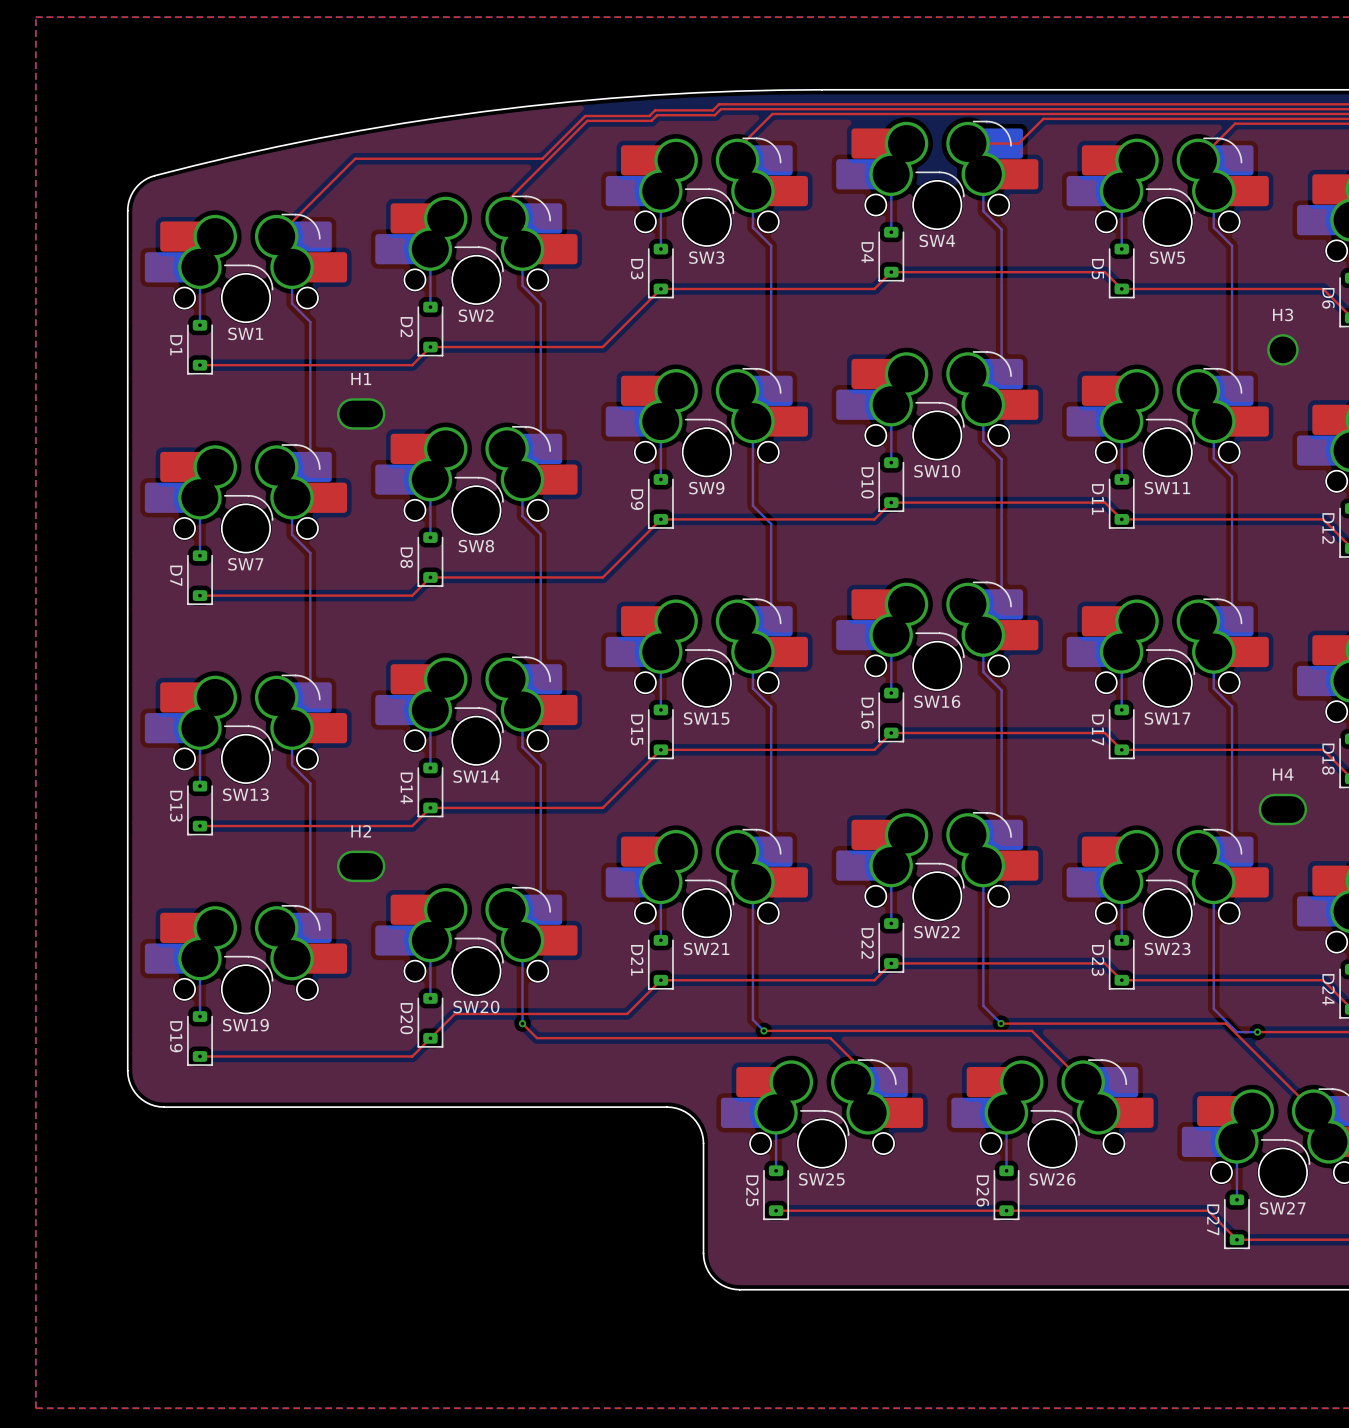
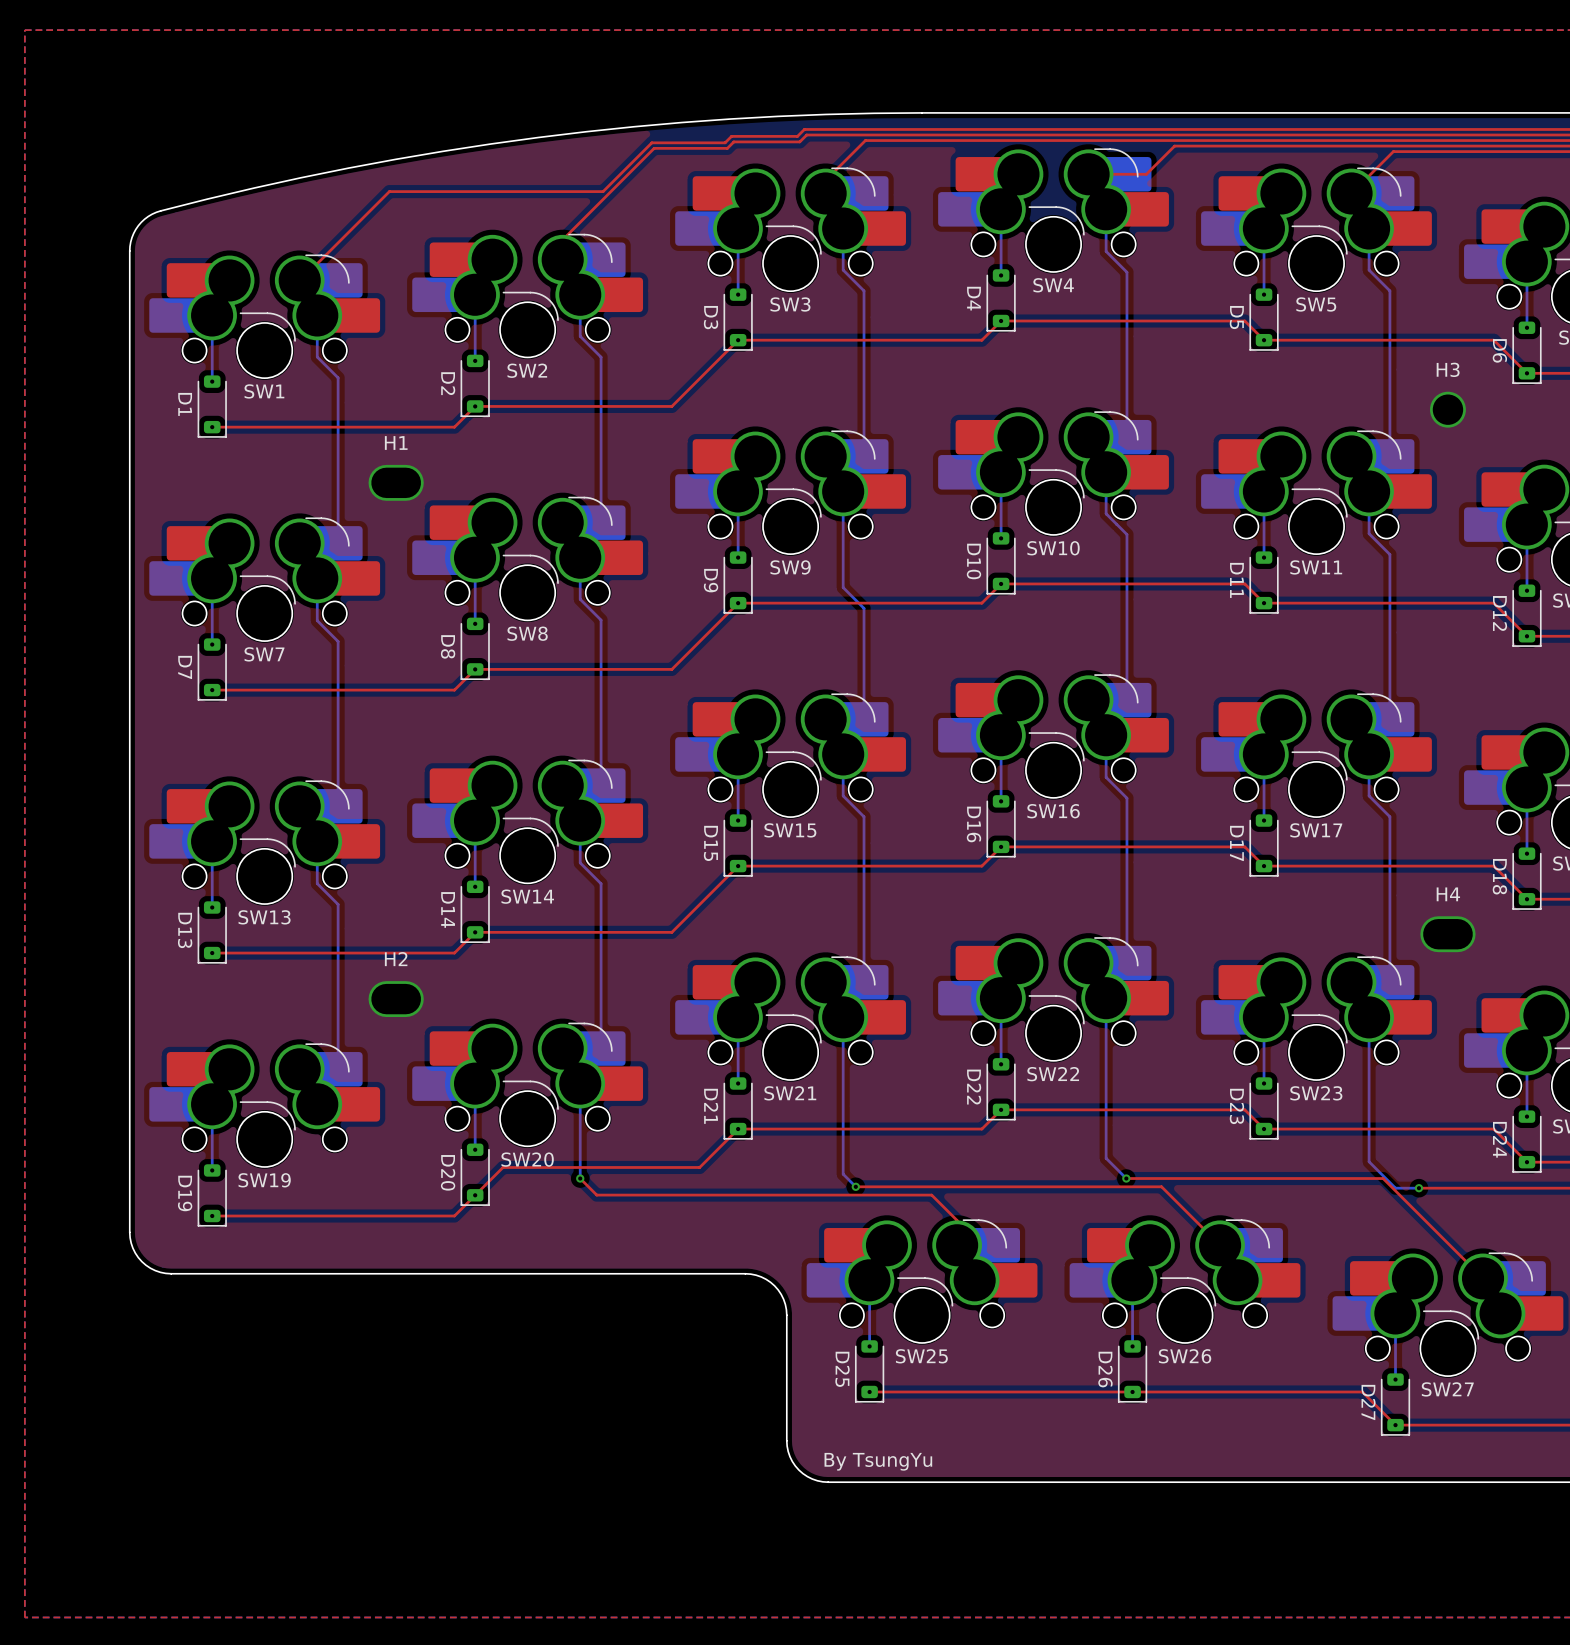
text: none -> By TsungYu (878, 1461)

